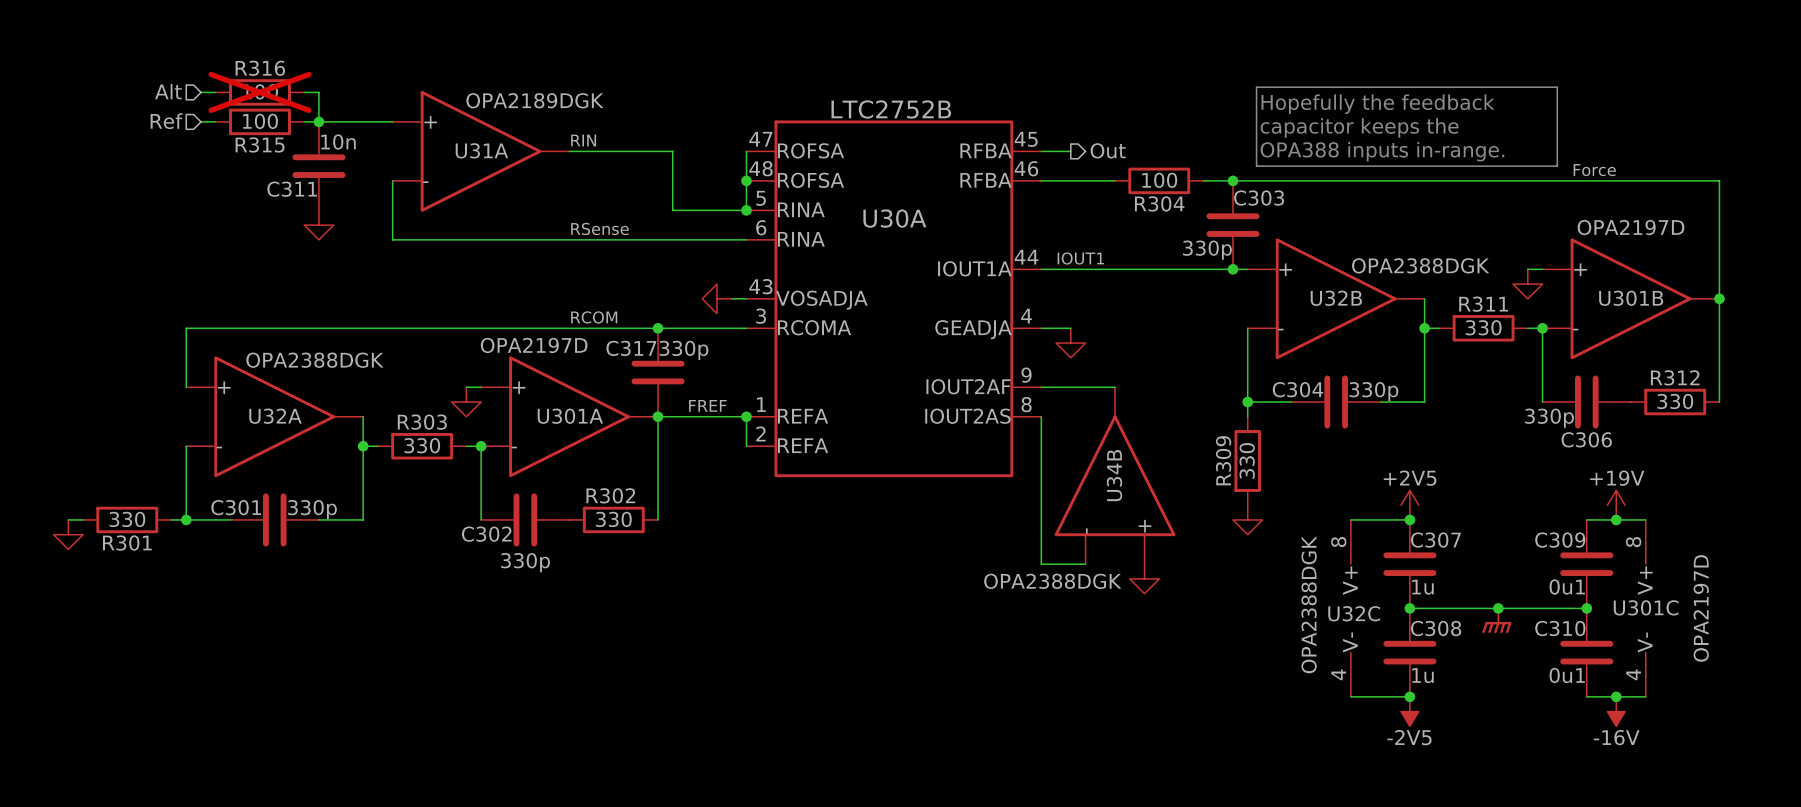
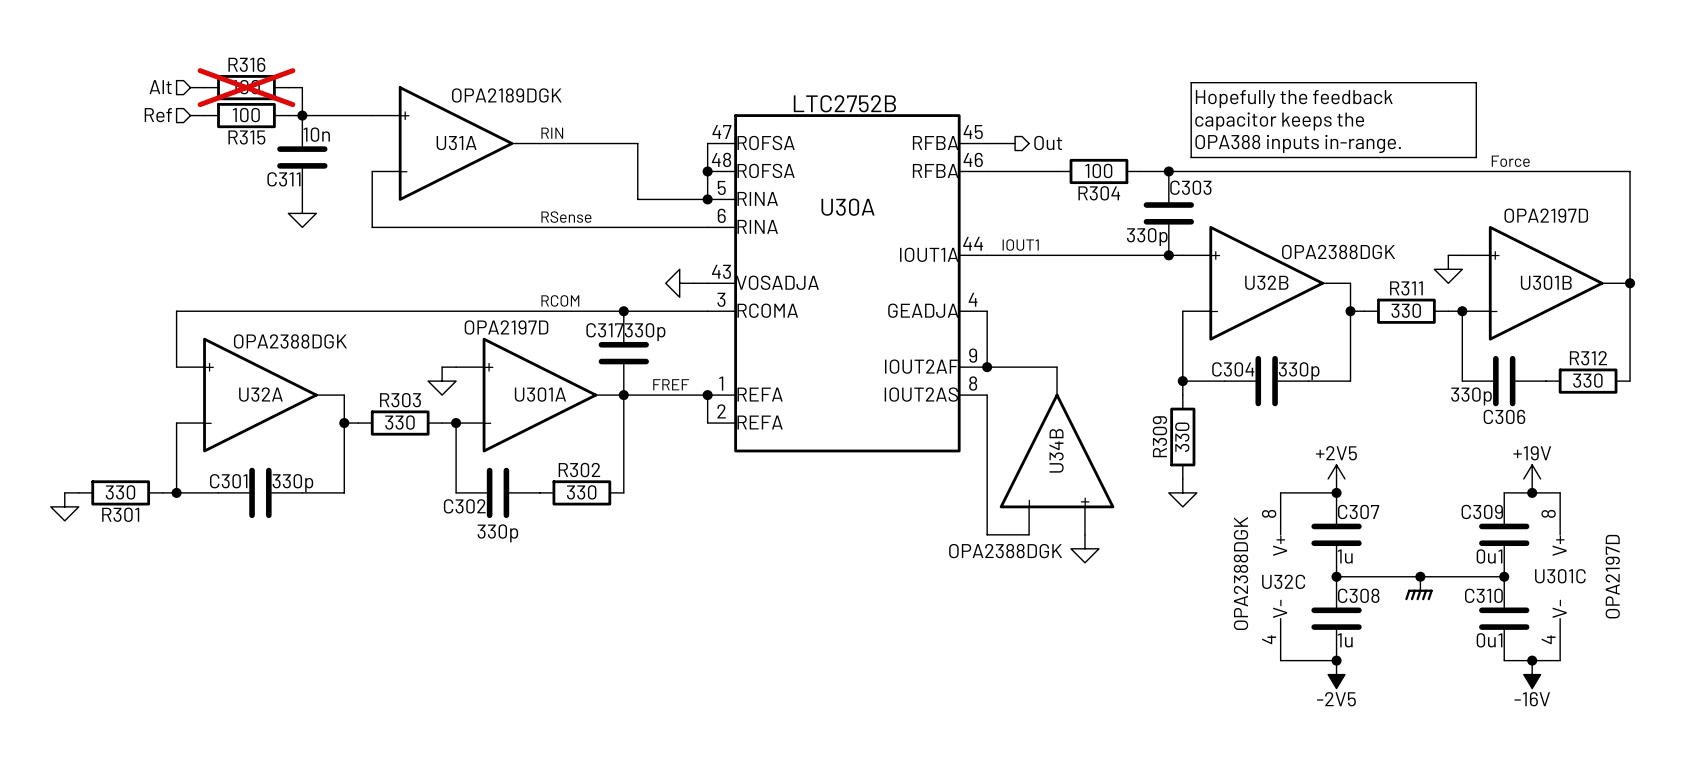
wire: (1041, 328) (1070, 328) -> (987, 311) (987, 367)
power symbol: (1070, 343) -> none
junction: none -> (987, 367)

